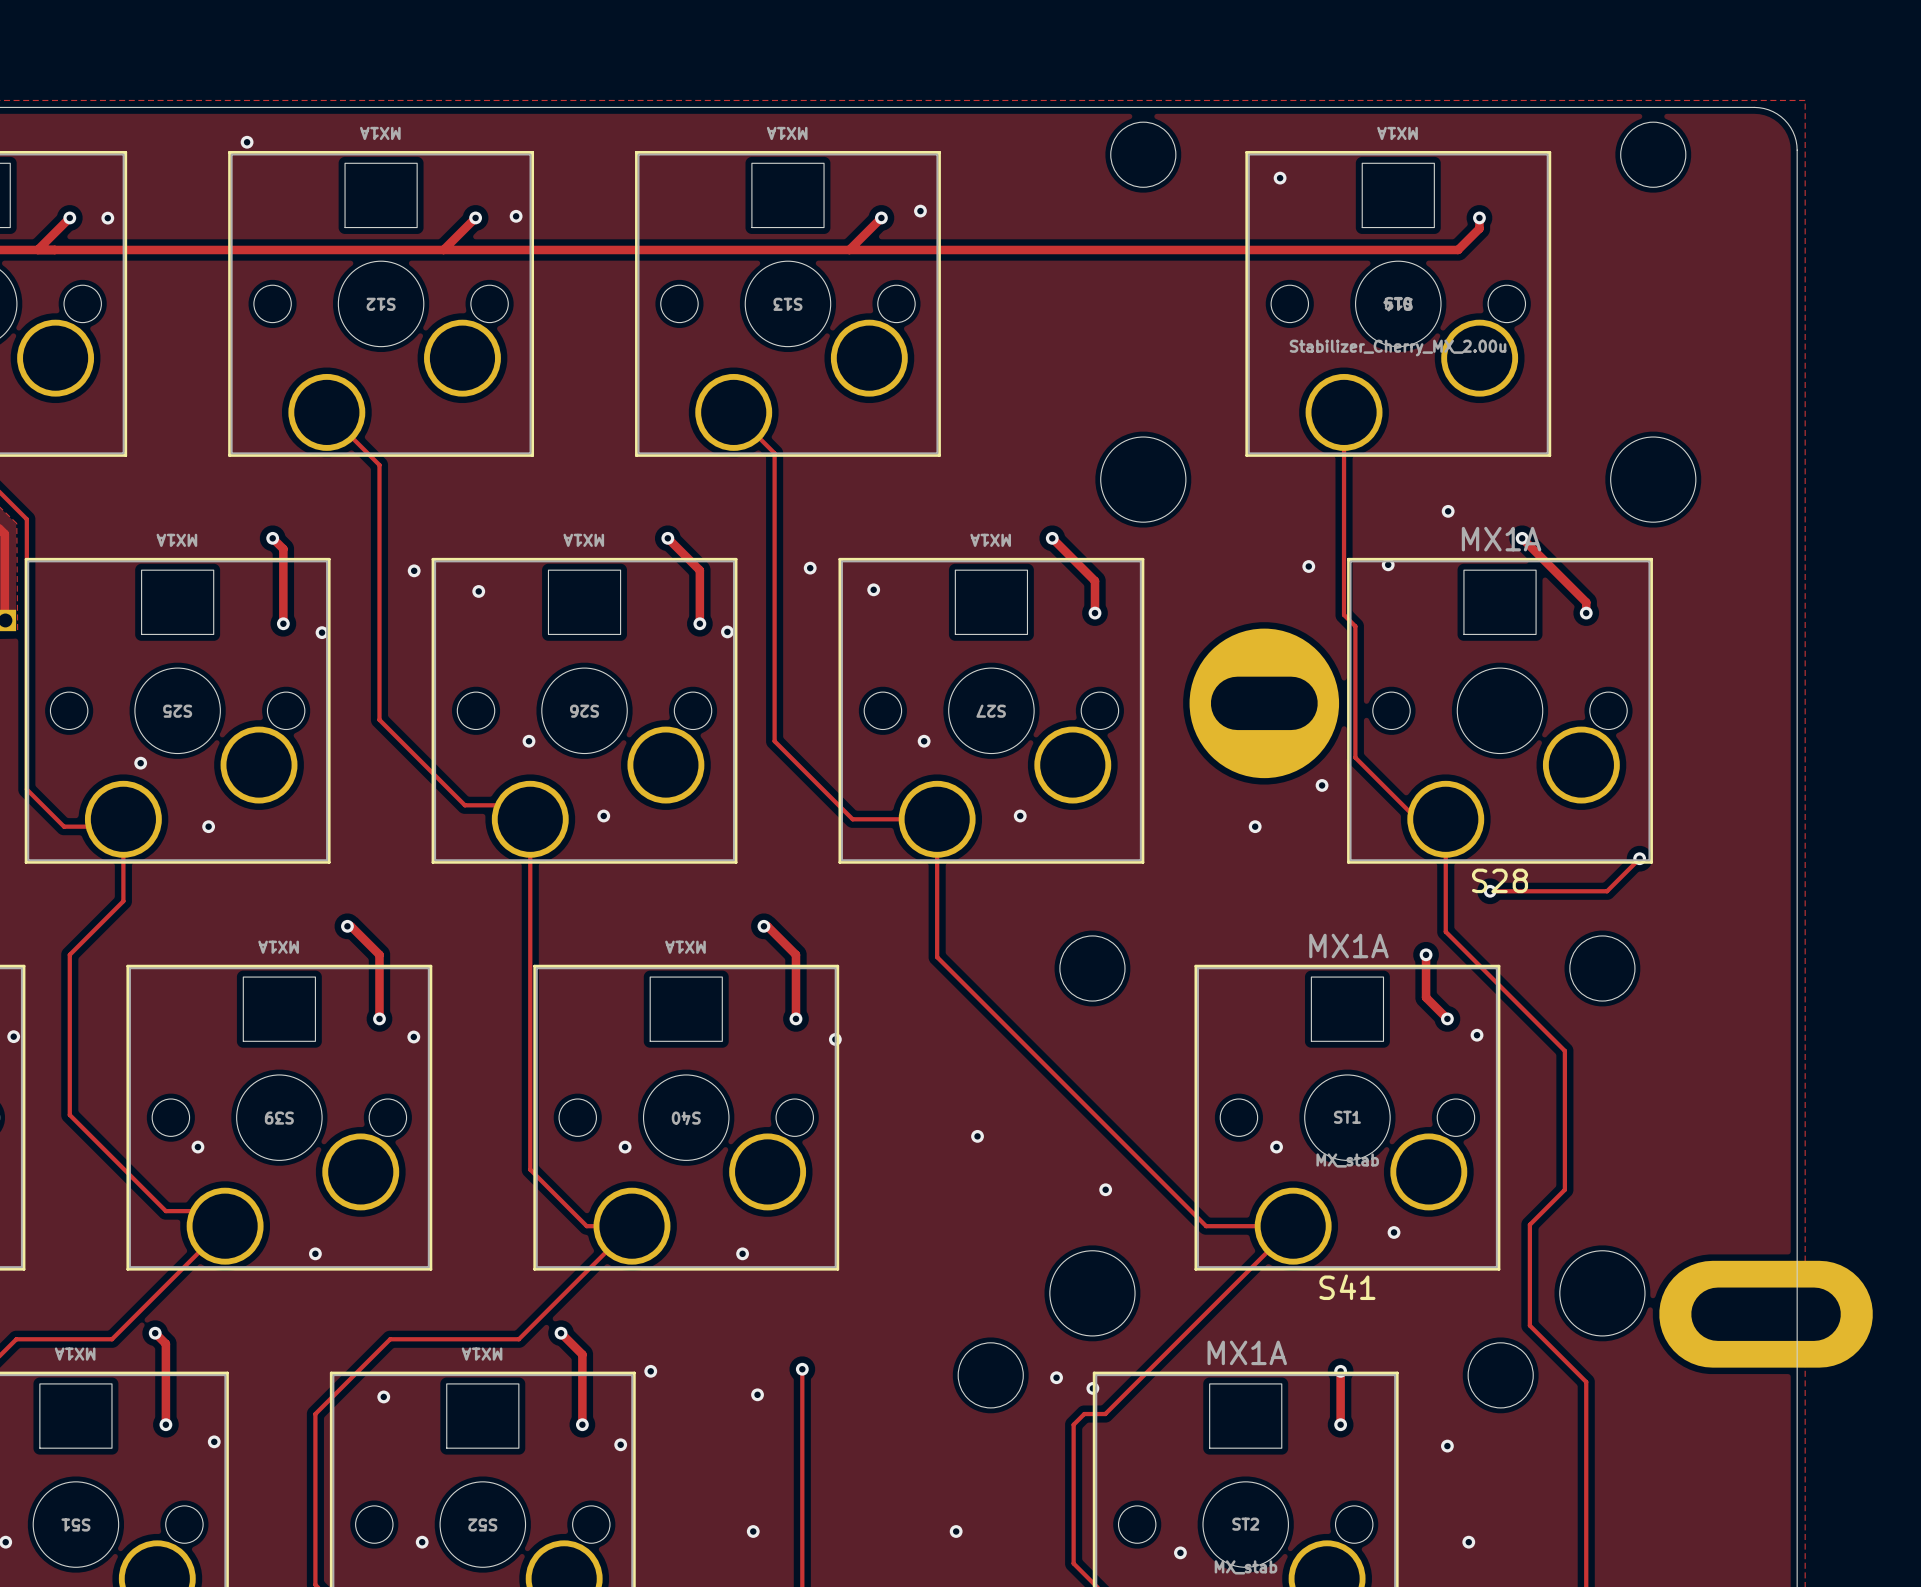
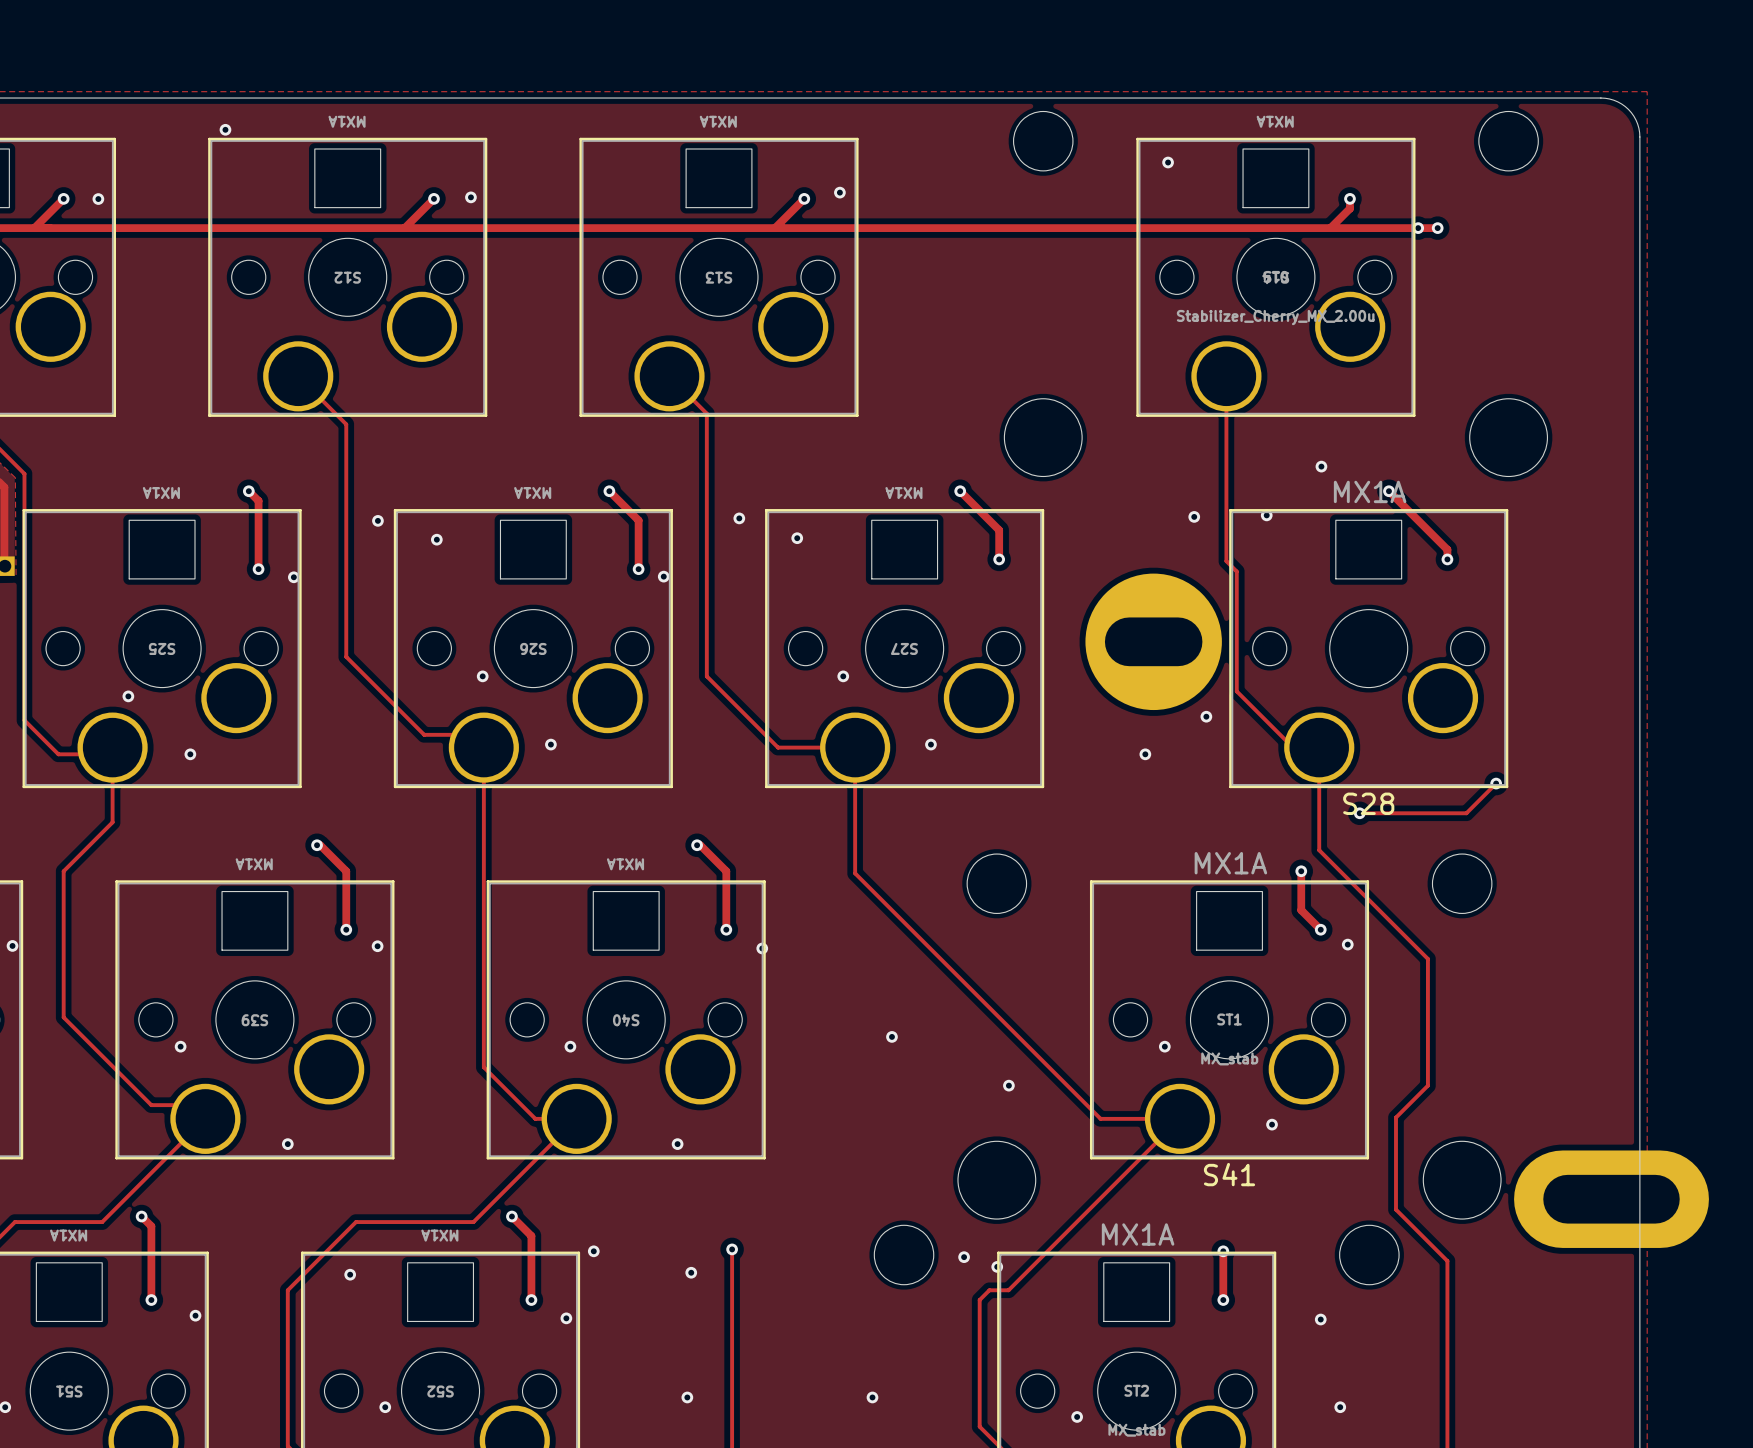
track: none -> (1330, 228) (1437, 228)
via: none -> (1418, 228)
via: none -> (1437, 228)

